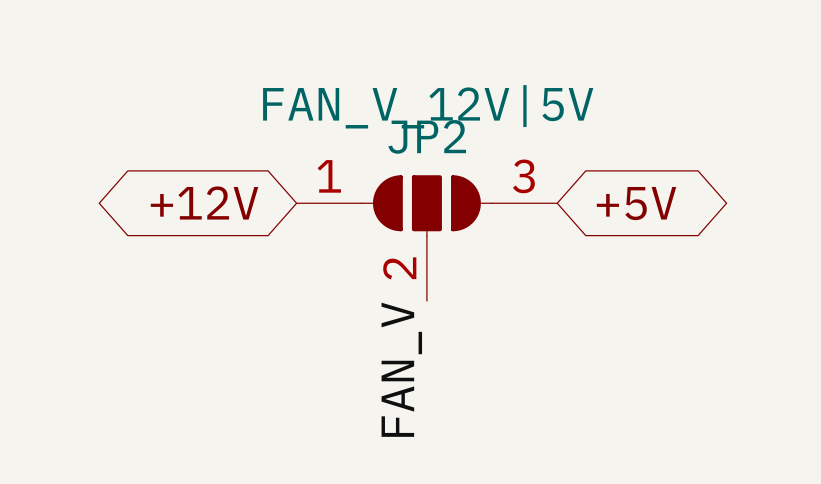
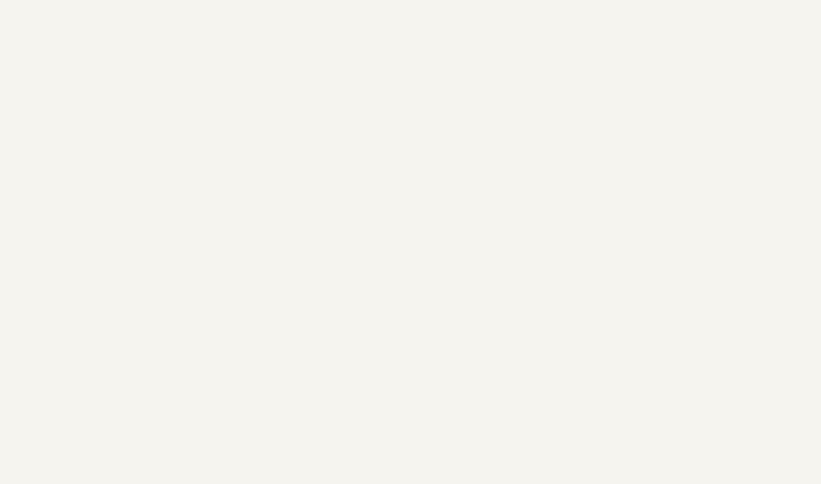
global label: +12V (204, 202) -> none
global label: +5V (636, 203) -> none
JP2: FAN_V_12V|5V (426, 238) -> none
label: FAN_V (401, 369) -> none

